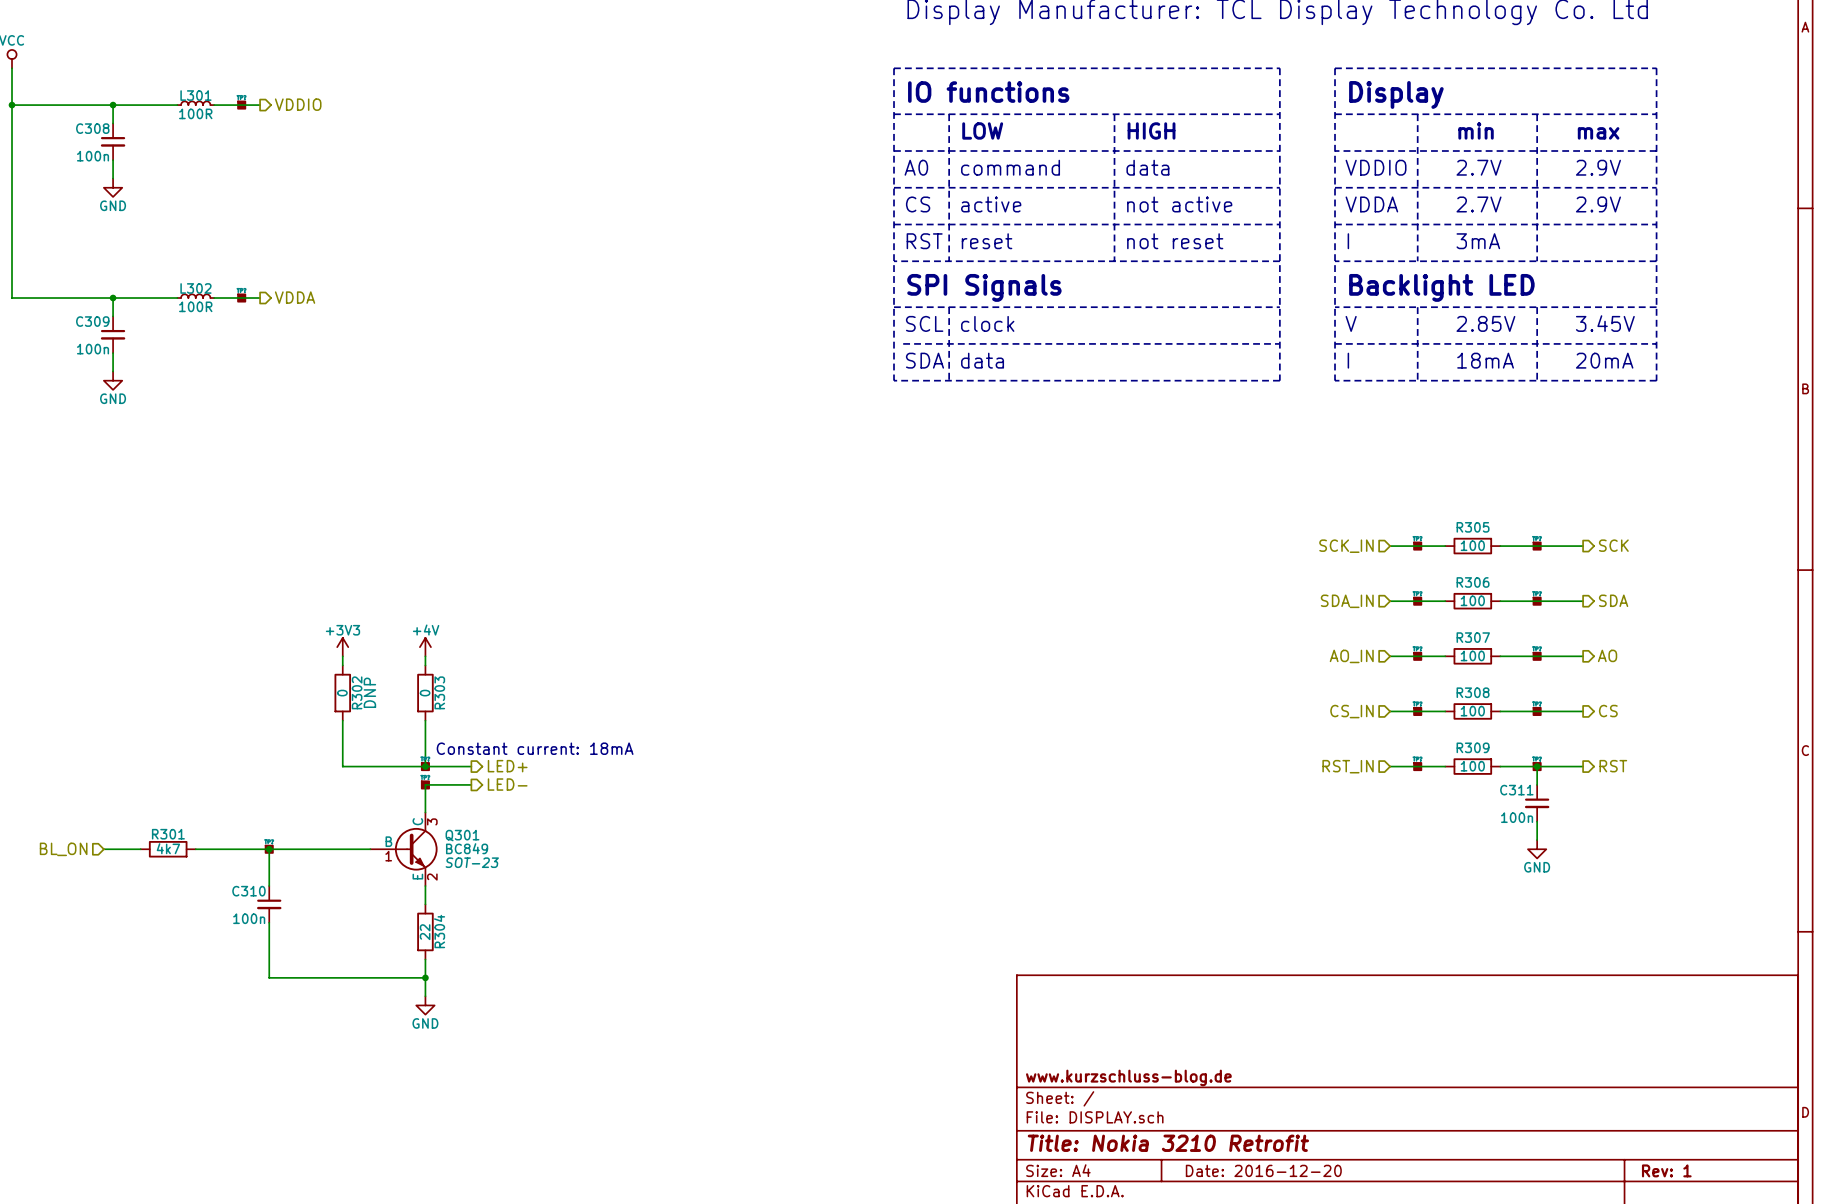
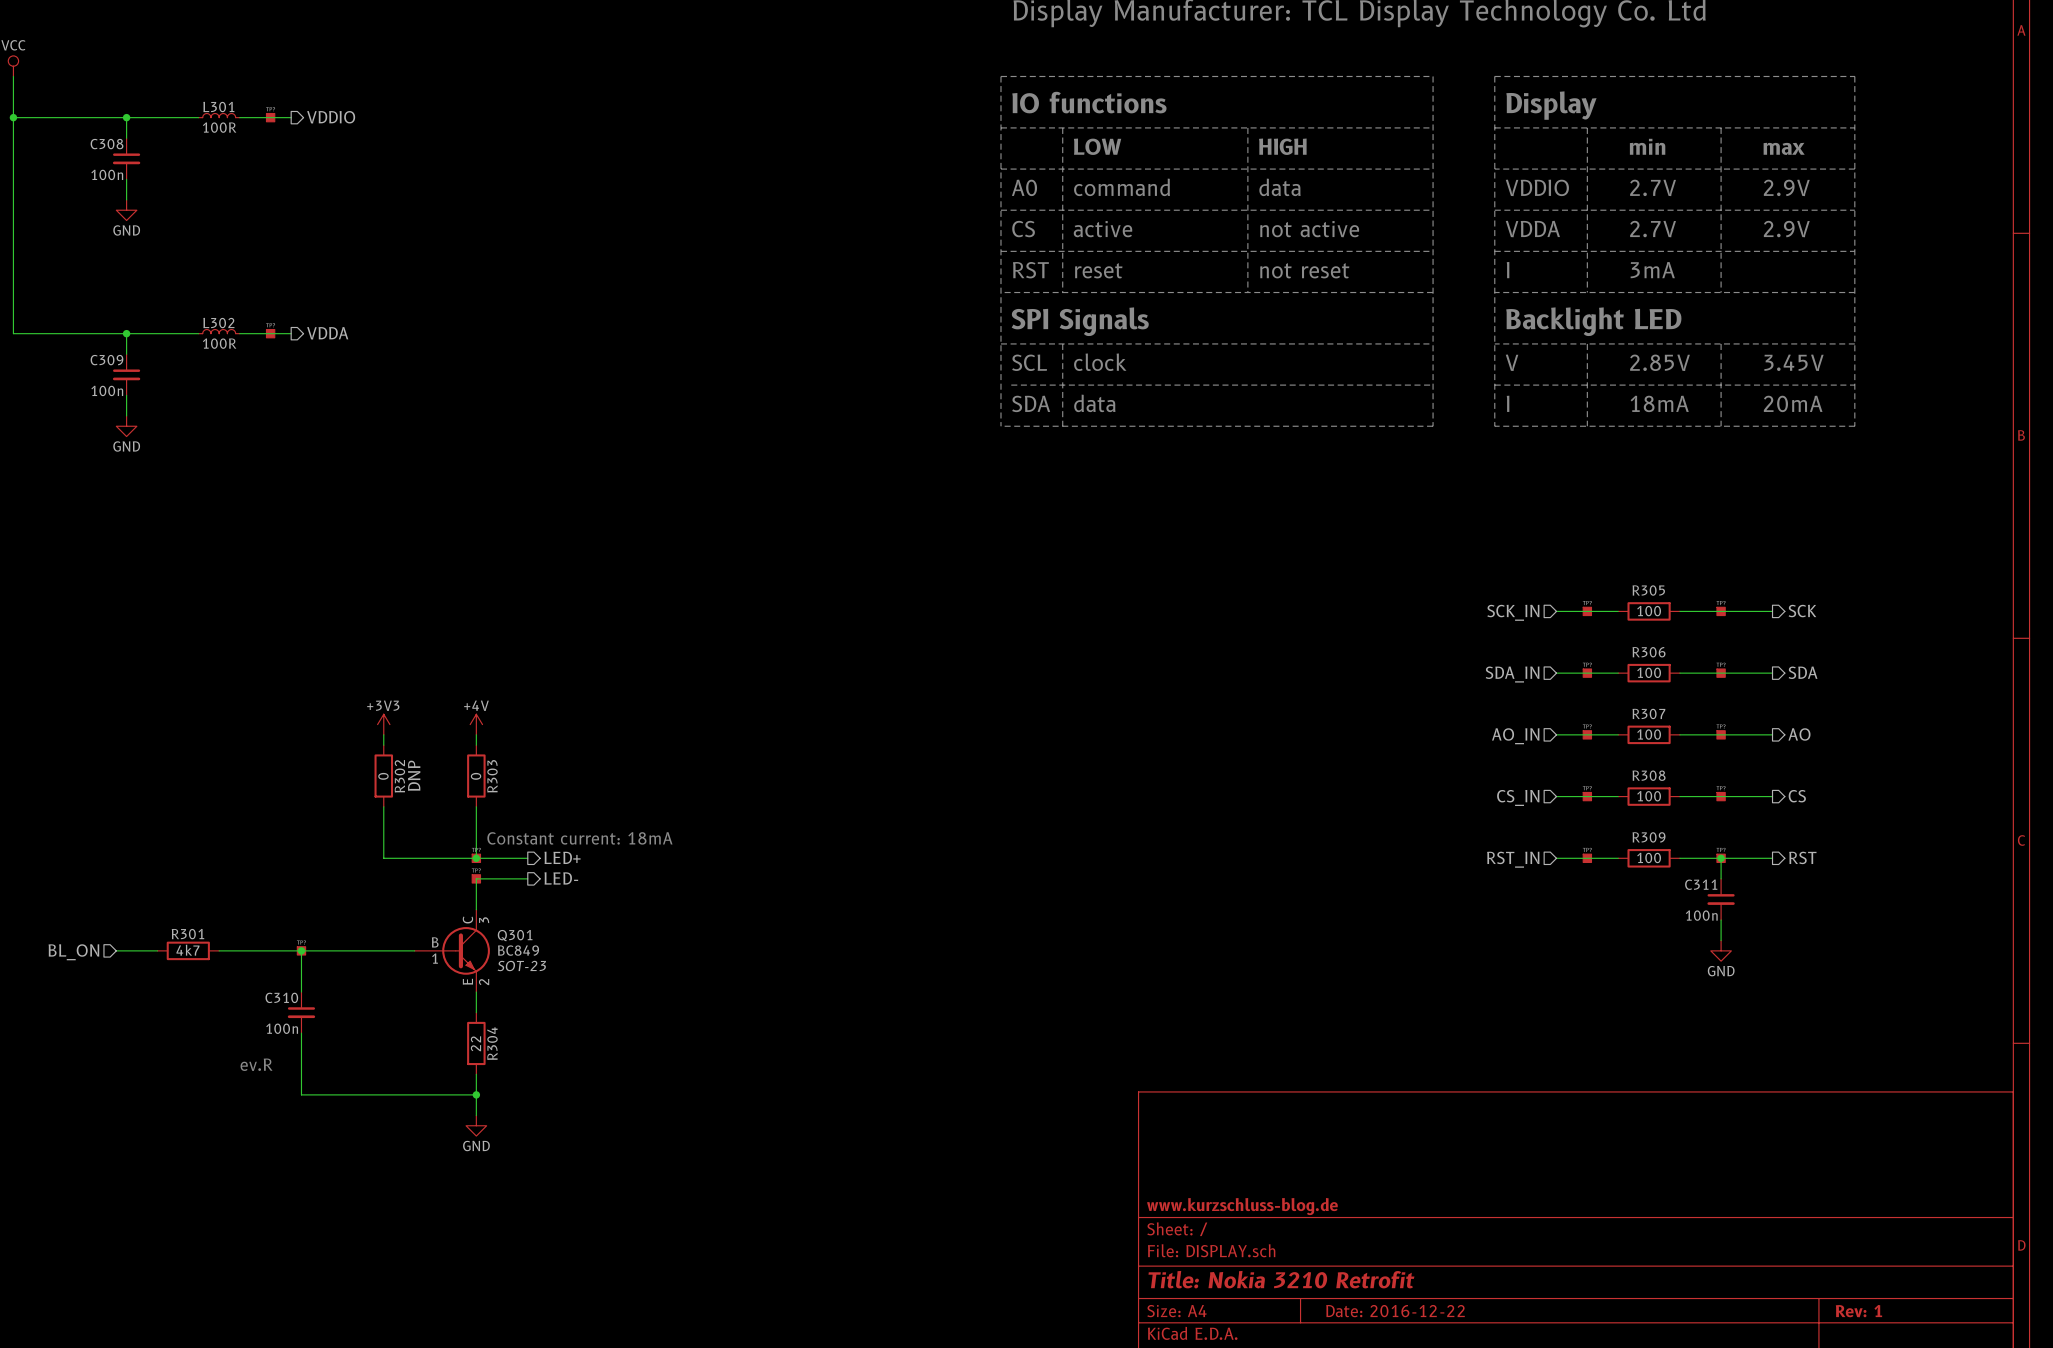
text: none -> ev.R (256, 1064)
title block: Date: 2016-12-20 (1263, 1170) -> Date: 2016-12-22 (1395, 1311)

